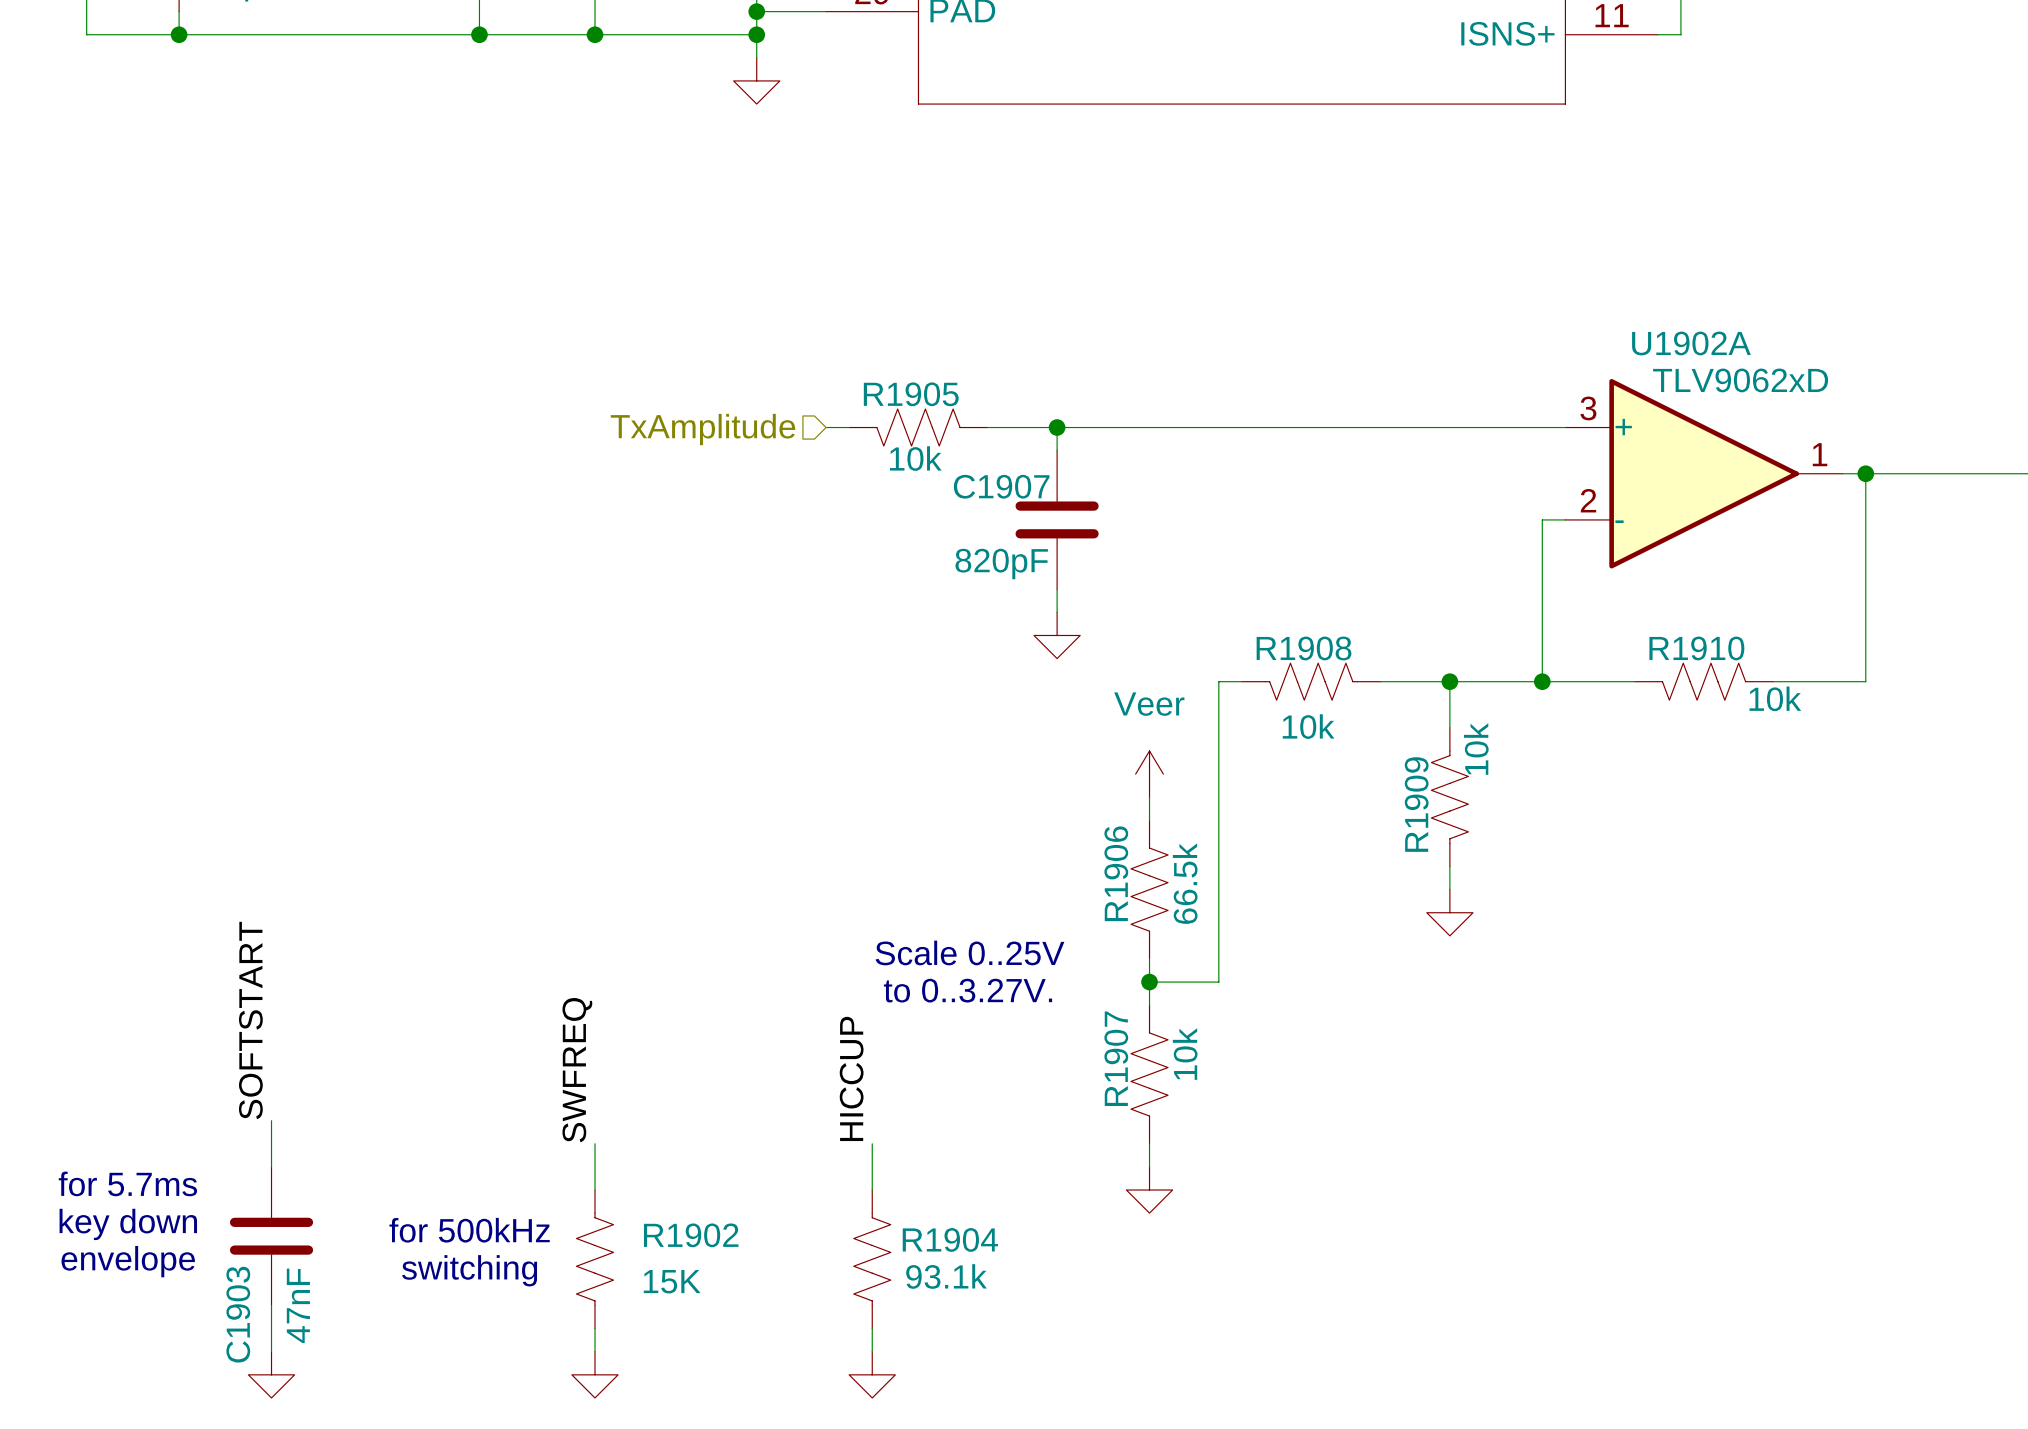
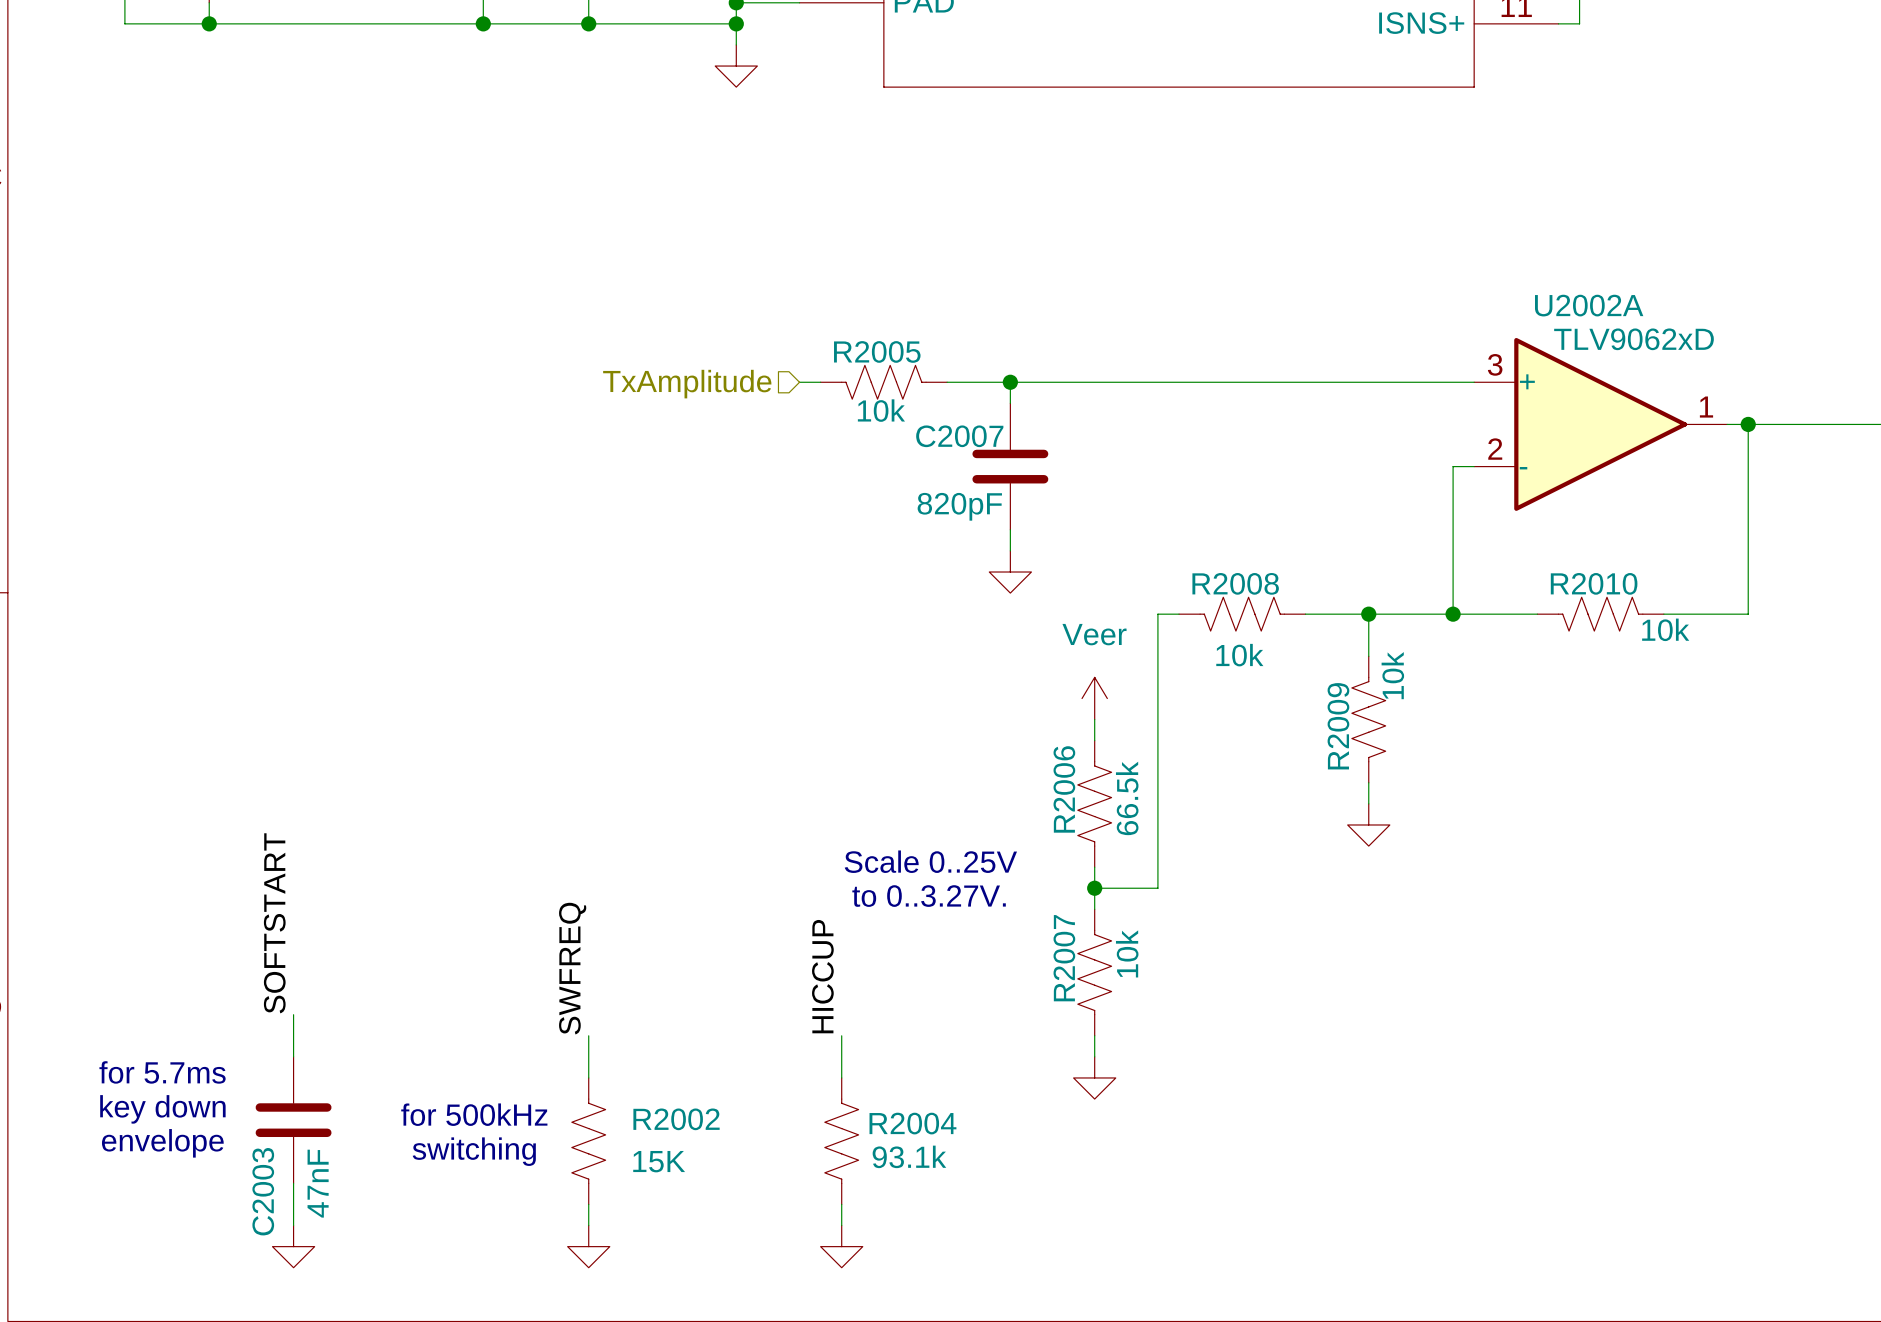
U1902A name: U1902A (1691, 343) -> U2002A (1589, 305)
R1905 name: R1905 (911, 394) -> R2005 (877, 351)
C1907 name: C1907 (1001, 486) -> C2007 (959, 436)
R1908 name: R1908 (1304, 648) -> R2008 (1235, 583)
R1910 name: R1910 (1696, 648) -> R2010 (1594, 583)
R1909 name: R1909 (1416, 804) -> R2009 (1338, 726)
R1906 name: R1906 (1116, 873) -> R2006 (1064, 789)
R1907 name: R1907 (1116, 1058) -> R2007 (1064, 958)
R1902 name: R1902 (691, 1235) -> R2002 (676, 1119)
R1904 name: R1904 (950, 1239) -> R2004 (912, 1123)
C1903 name: C1903 (238, 1314) -> C2003 (263, 1191)

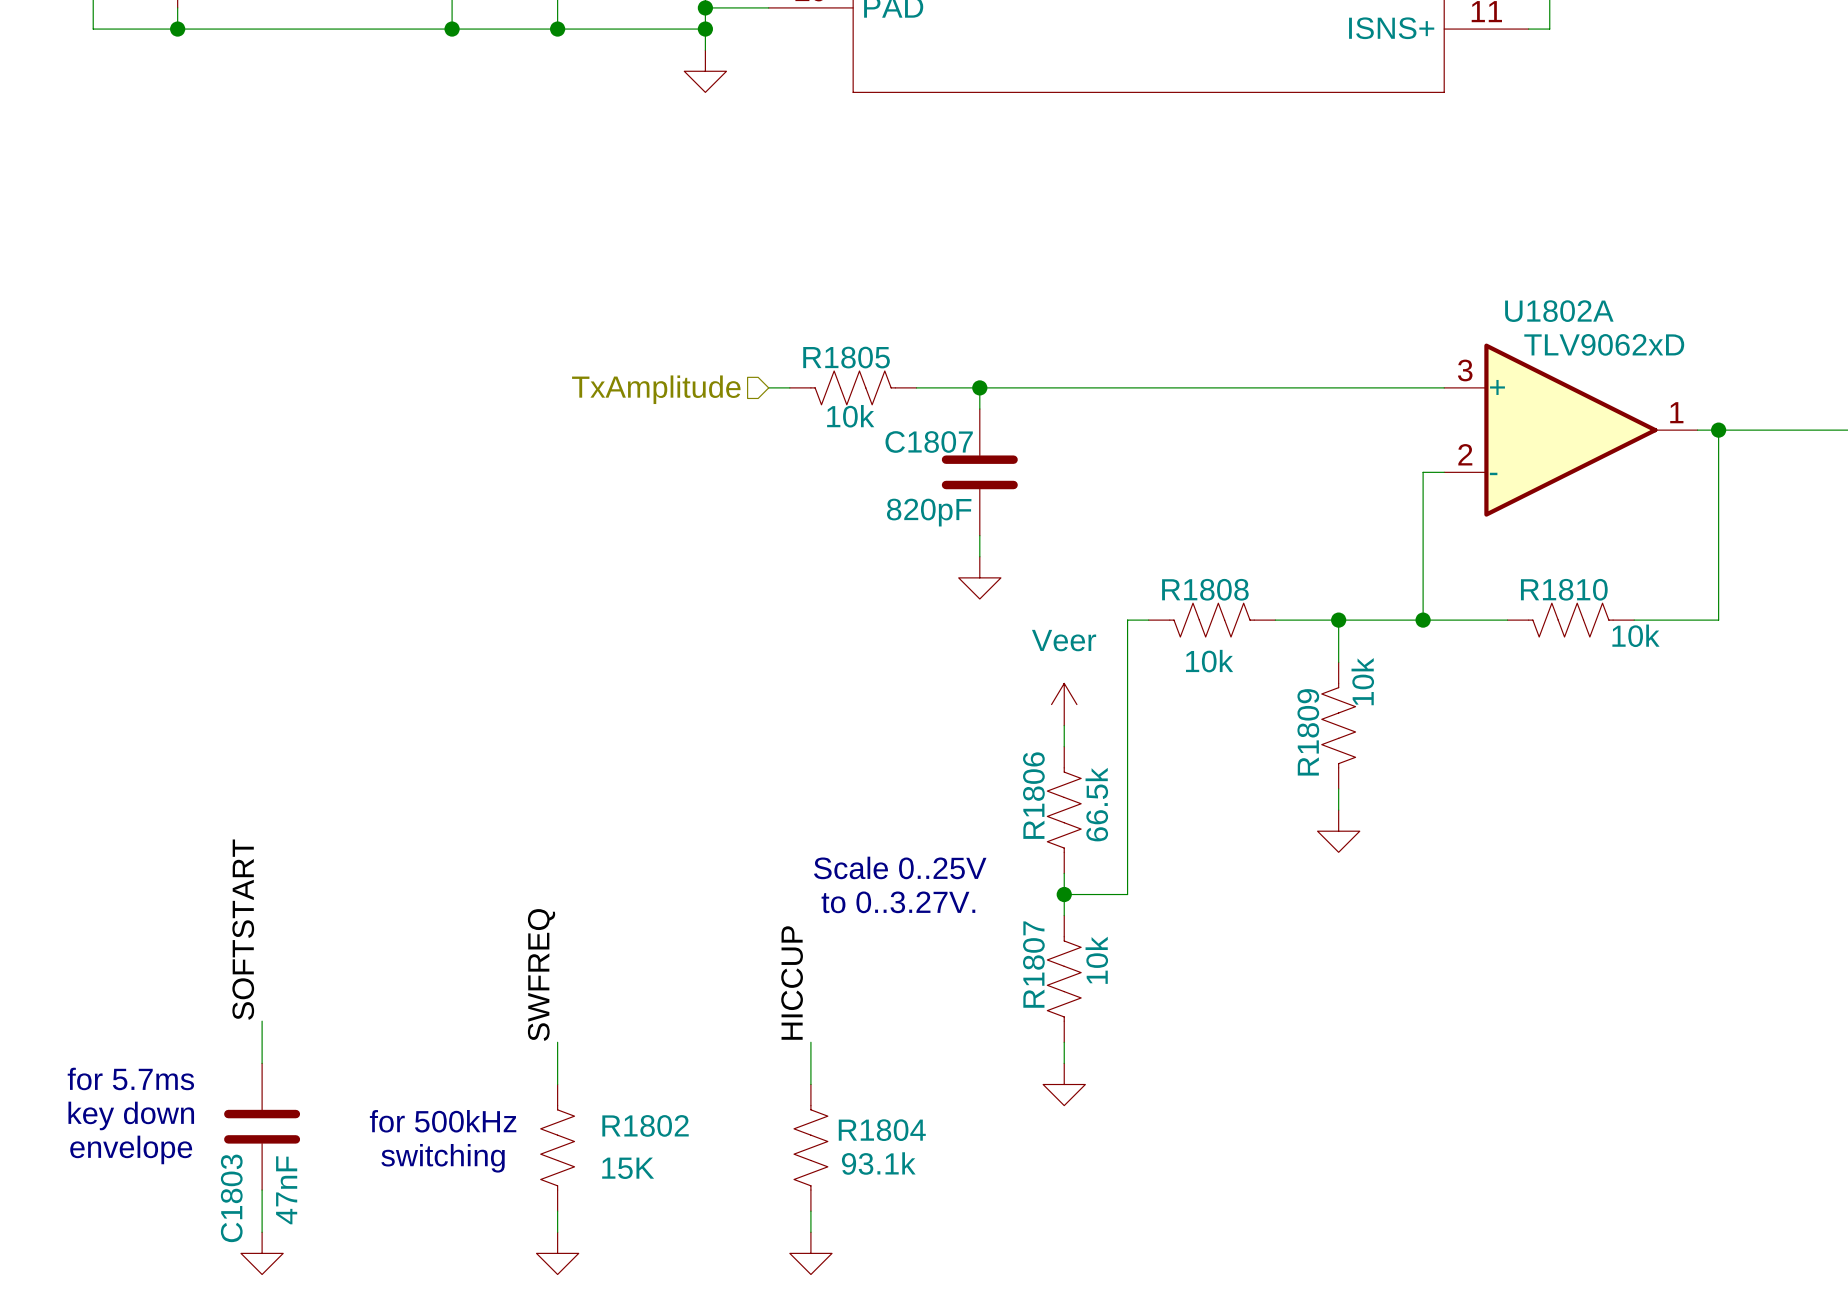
U2002A name: U2002A (1589, 305) -> U1802A (1559, 311)
R2005 name: R2005 (877, 351) -> R1805 (846, 357)
C2007 name: C2007 (959, 436) -> C1807 (929, 441)
R2008 name: R2008 (1235, 583) -> R1808 (1205, 589)
R2010 name: R2010 (1594, 583) -> R1810 (1564, 589)
R2009 name: R2009 (1338, 726) -> R1809 (1308, 732)
R2006 name: R2006 (1064, 789) -> R1806 (1033, 795)
R2007 name: R2007 (1064, 958) -> R1807 (1033, 964)
R2002 name: R2002 (676, 1119) -> R1802 (645, 1125)
R2004 name: R2004 (912, 1123) -> R1804 (882, 1130)
C2003 name: C2003 (263, 1191) -> C1803 (231, 1198)

